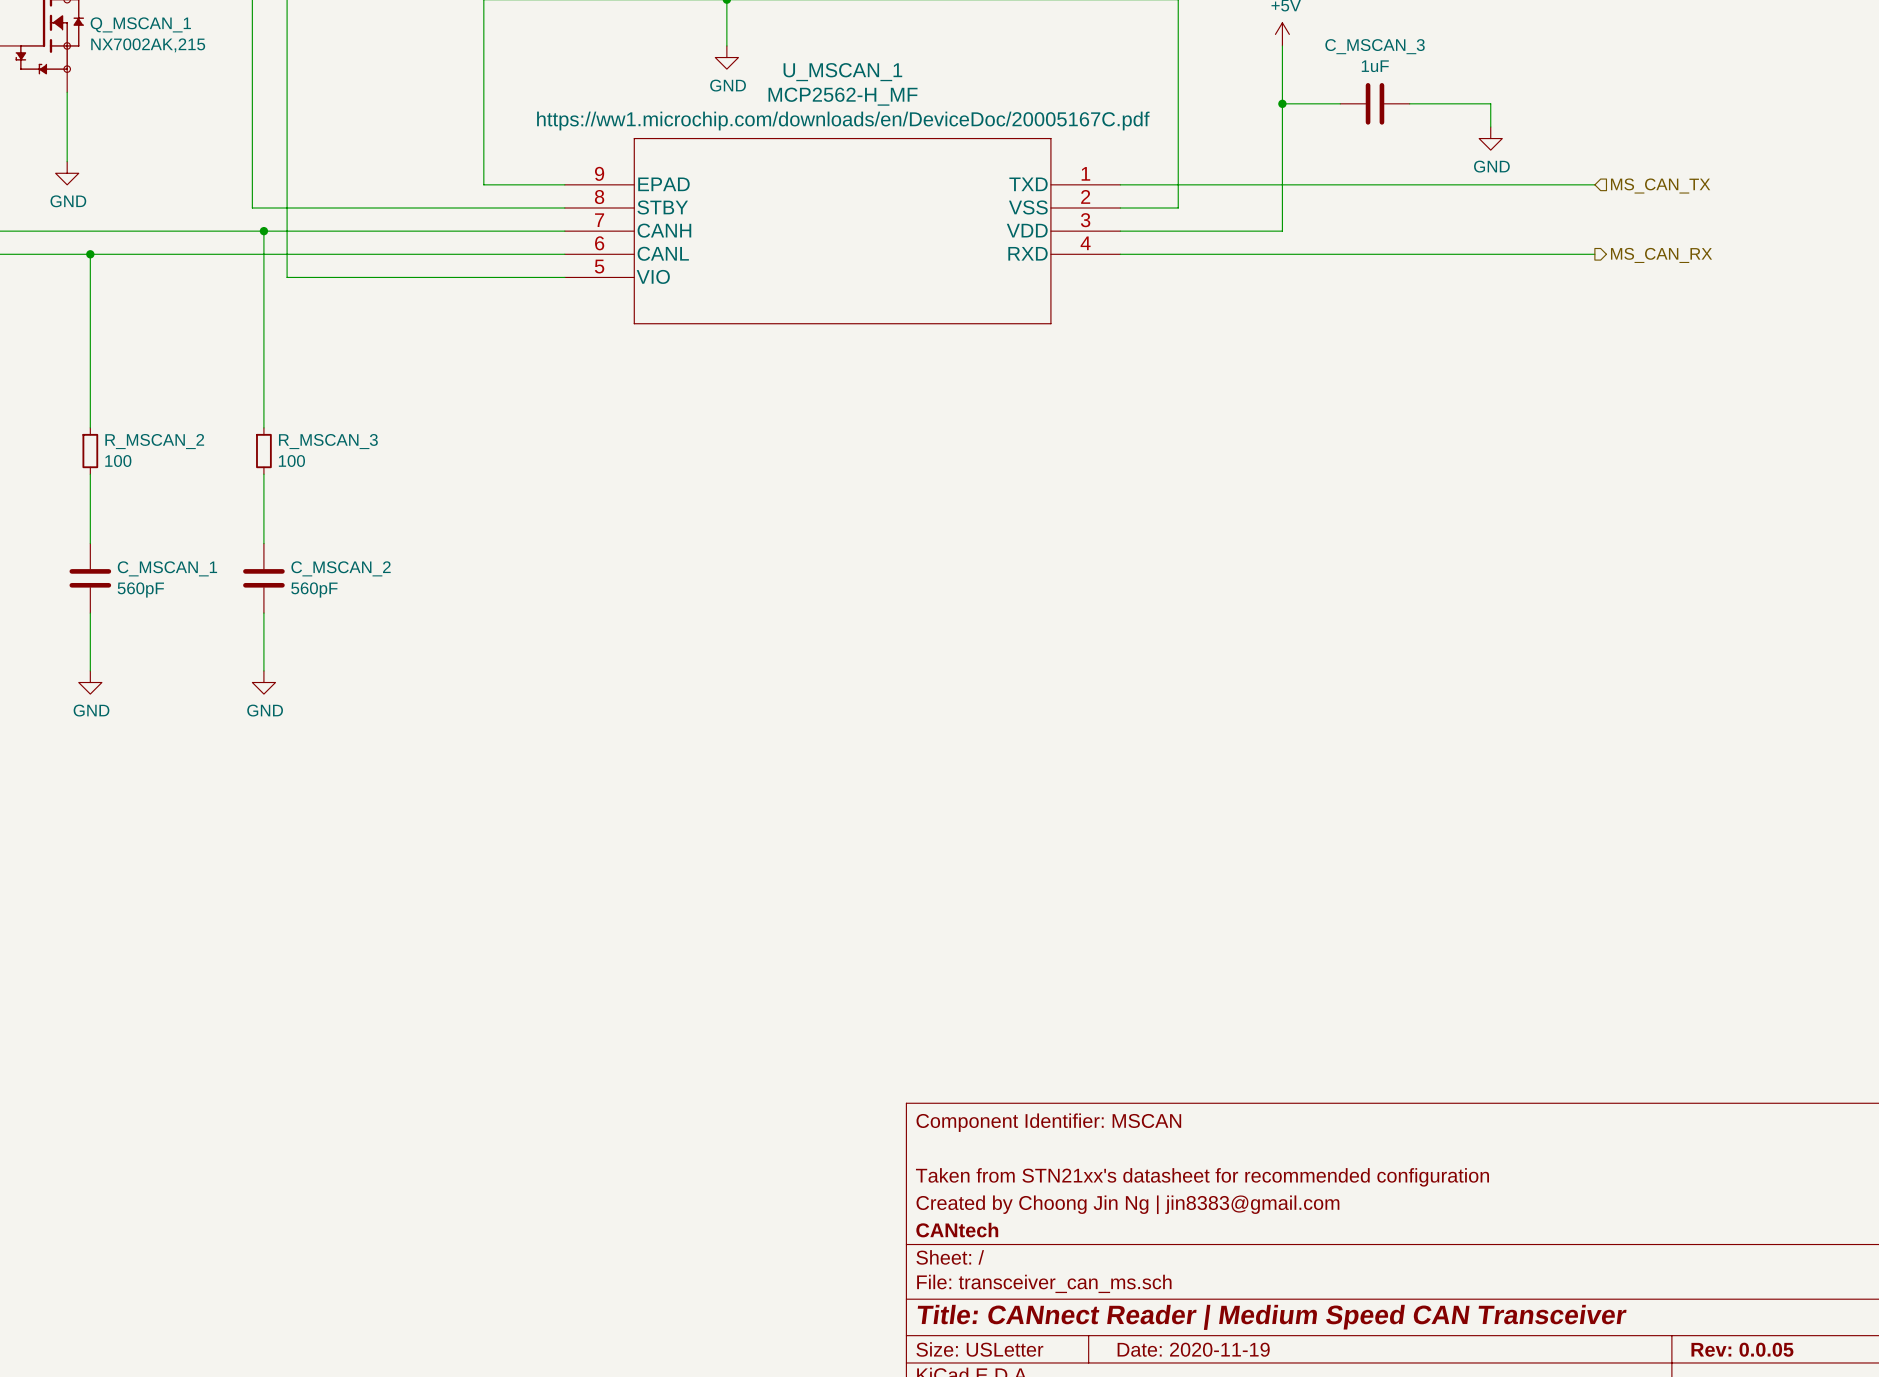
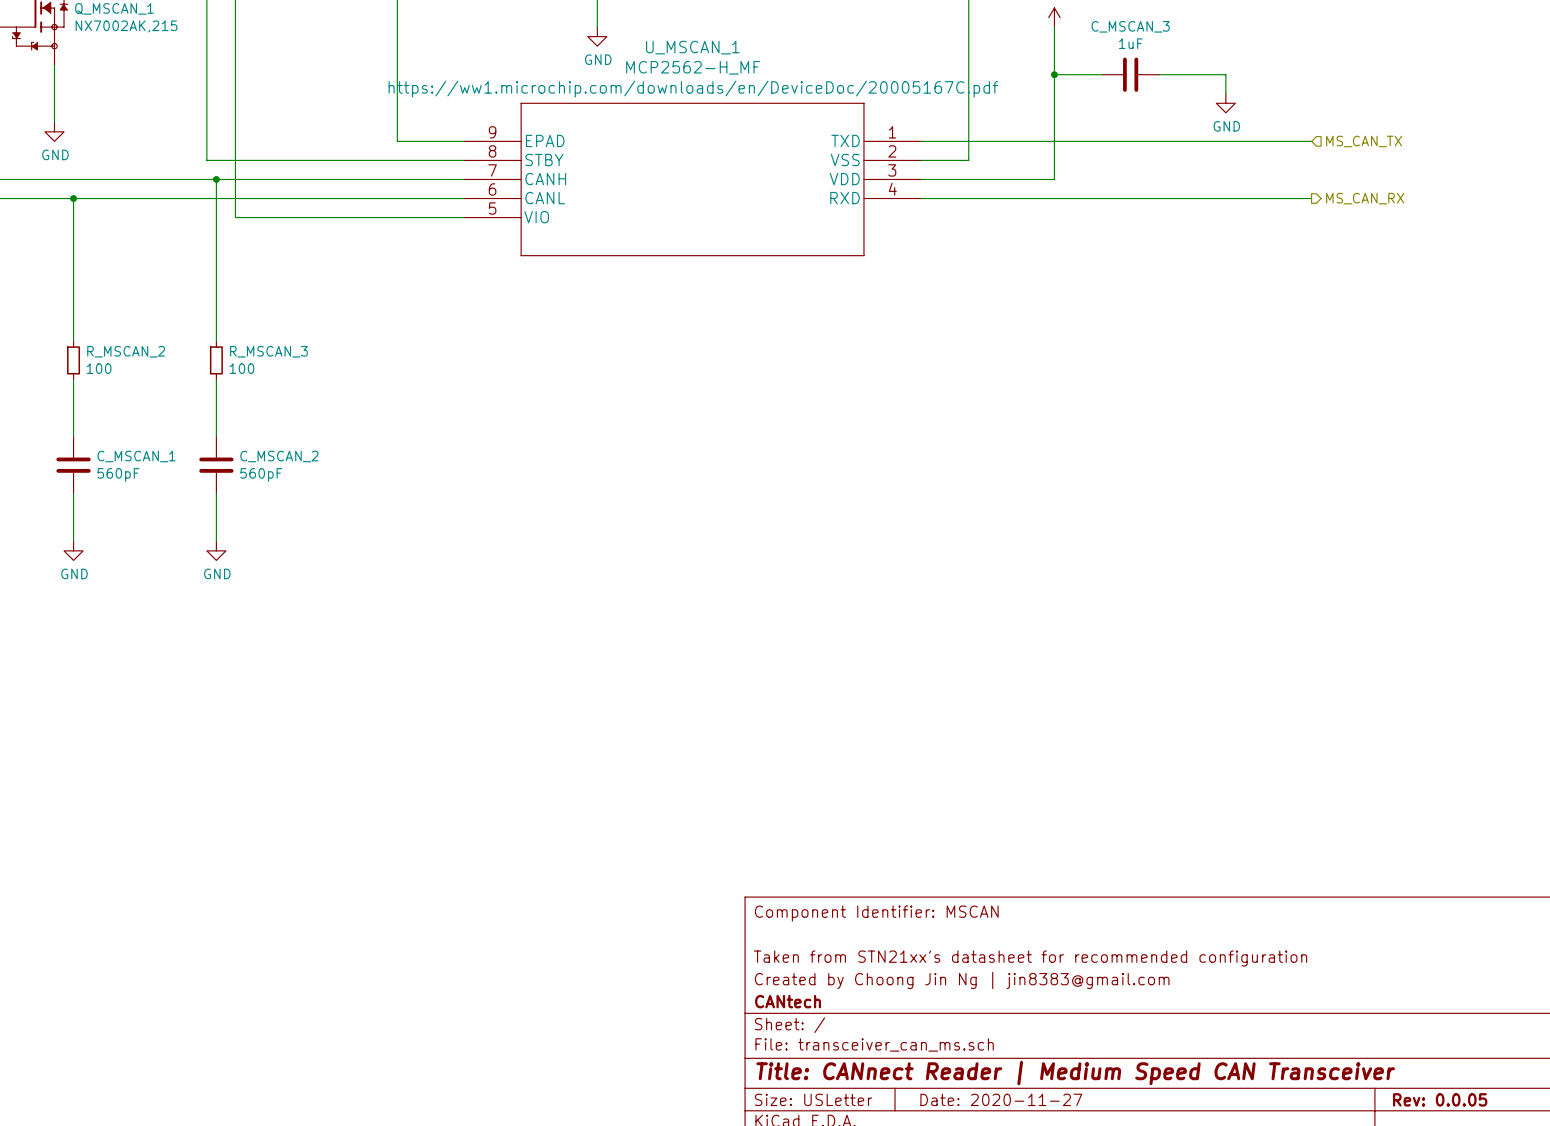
title block: Date: 2020-11-19 (1193, 1349) -> Date: 2020-11-27 (1001, 1099)

